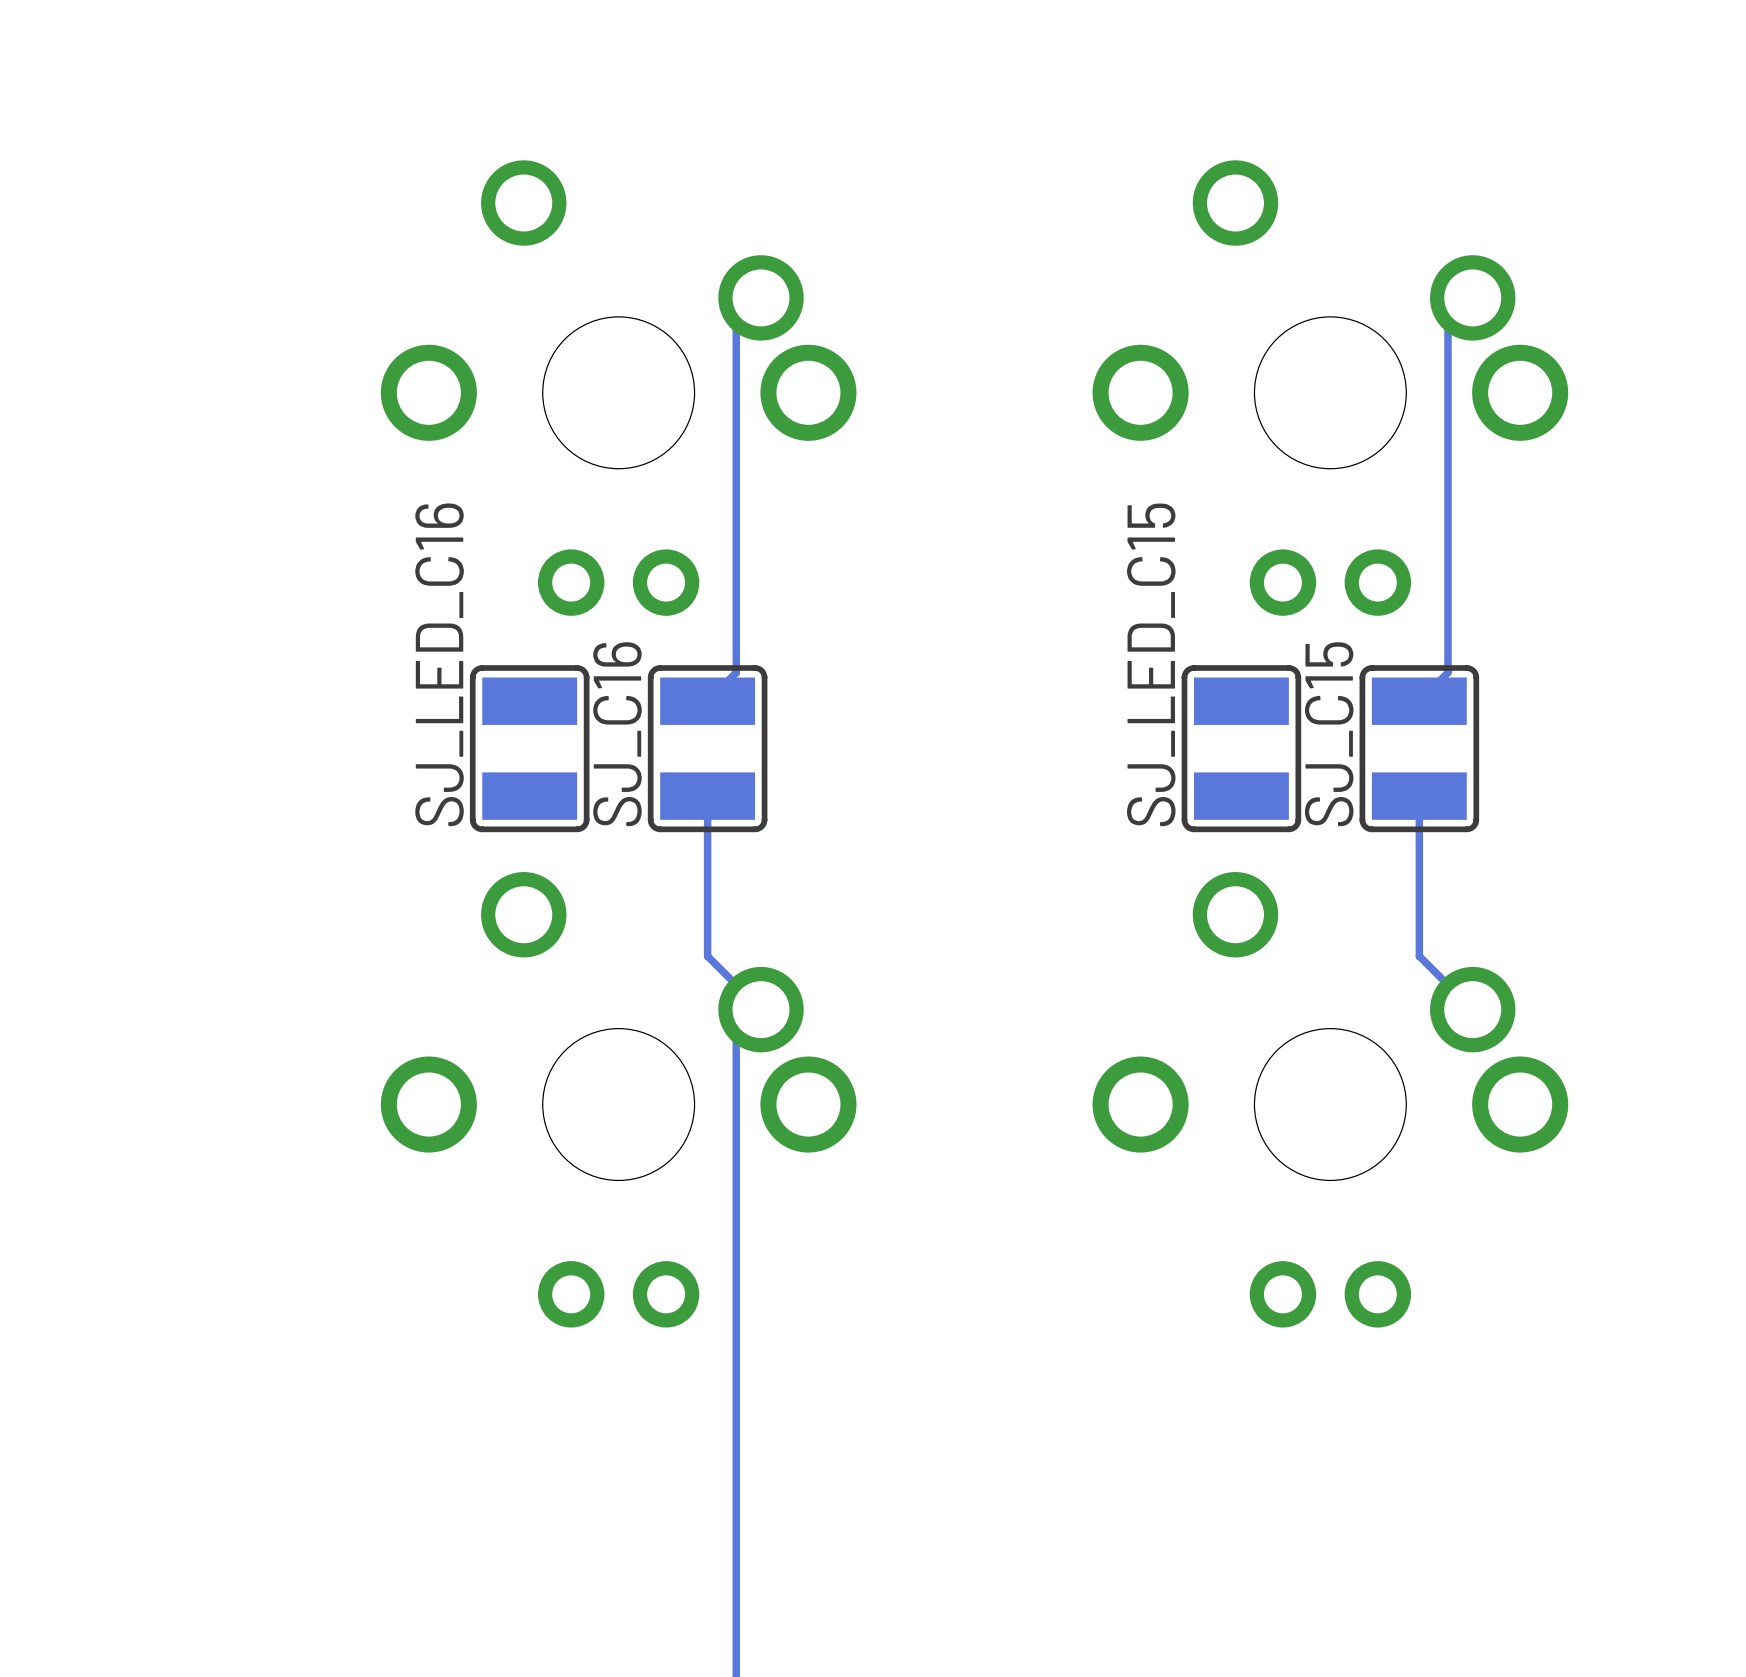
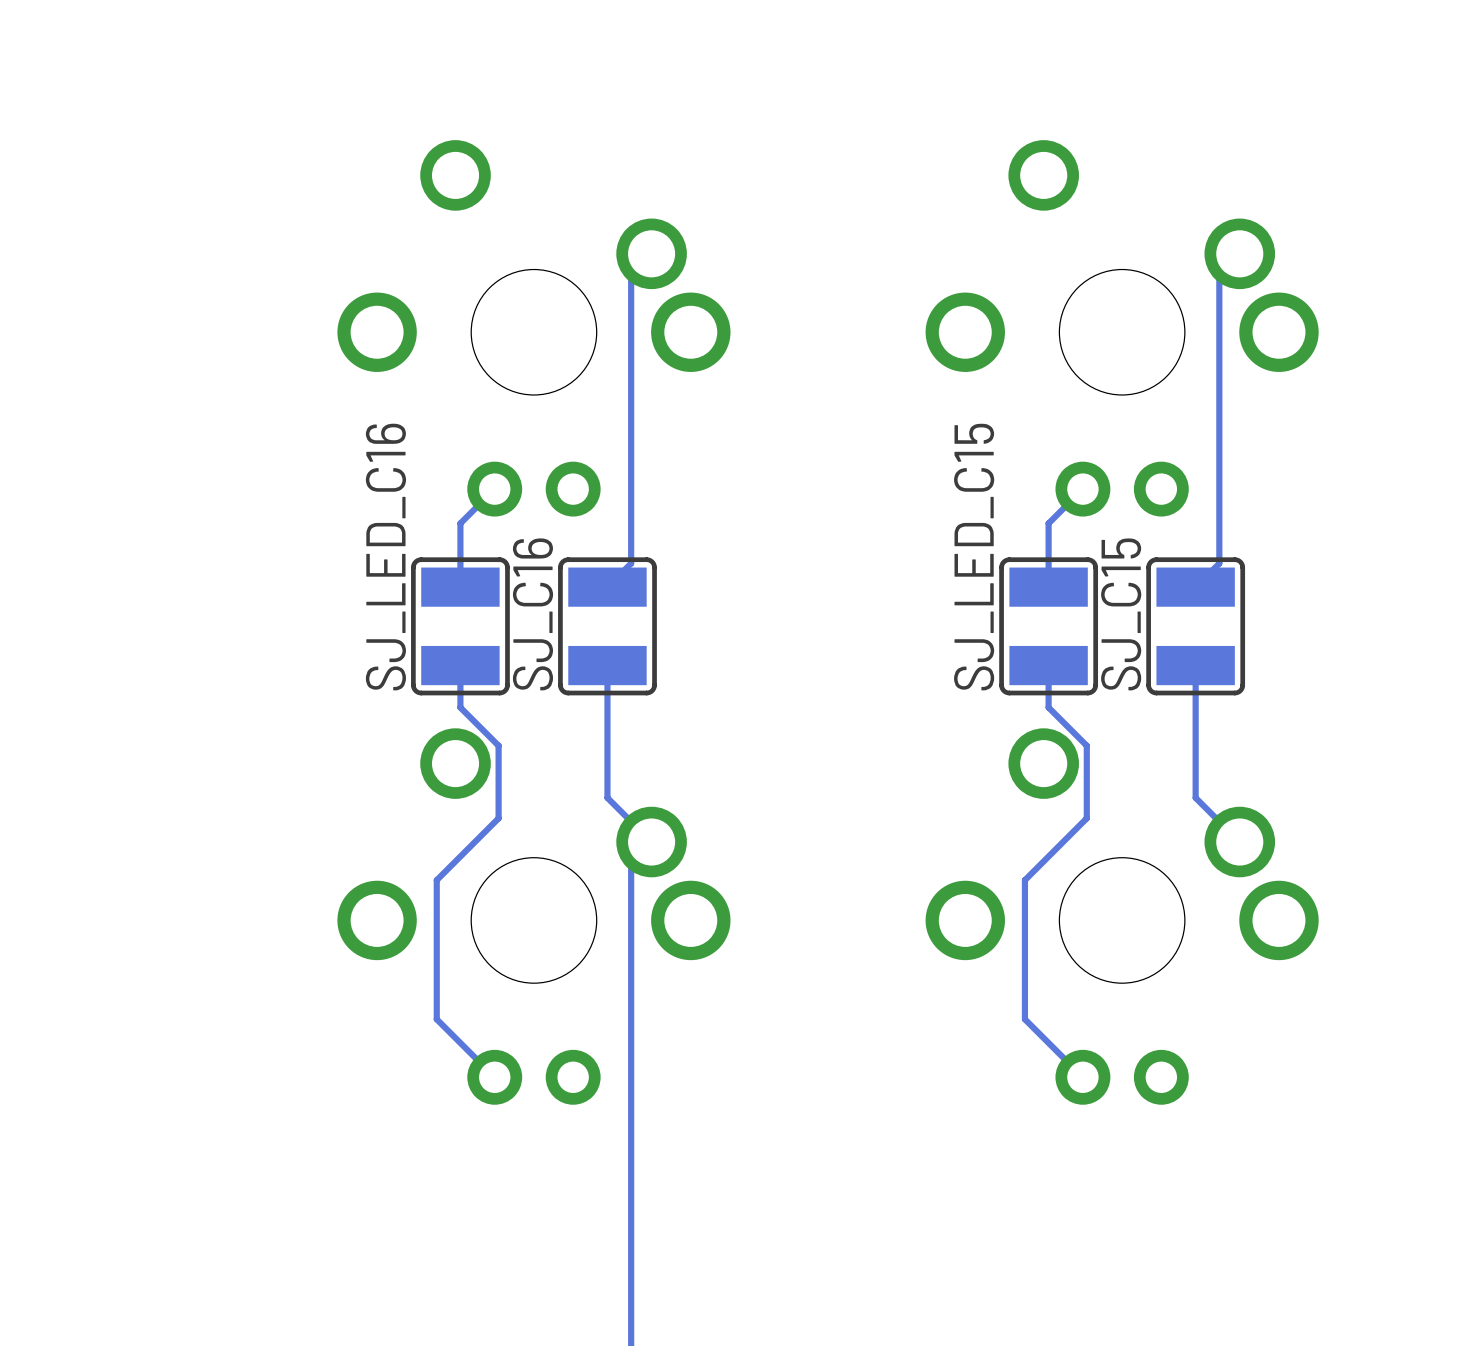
track: none -> (494, 489) (460, 523) (460, 587)
track: none -> (1082, 489) (1048, 523) (1048, 587)
track: none -> (460, 665) (460, 707) (498, 745) (498, 818) (436, 880) (436, 1019) (494, 1077)
track: none -> (1048, 665) (1048, 707) (1086, 745) (1086, 818) (1024, 880) (1024, 1019) (1082, 1077)

